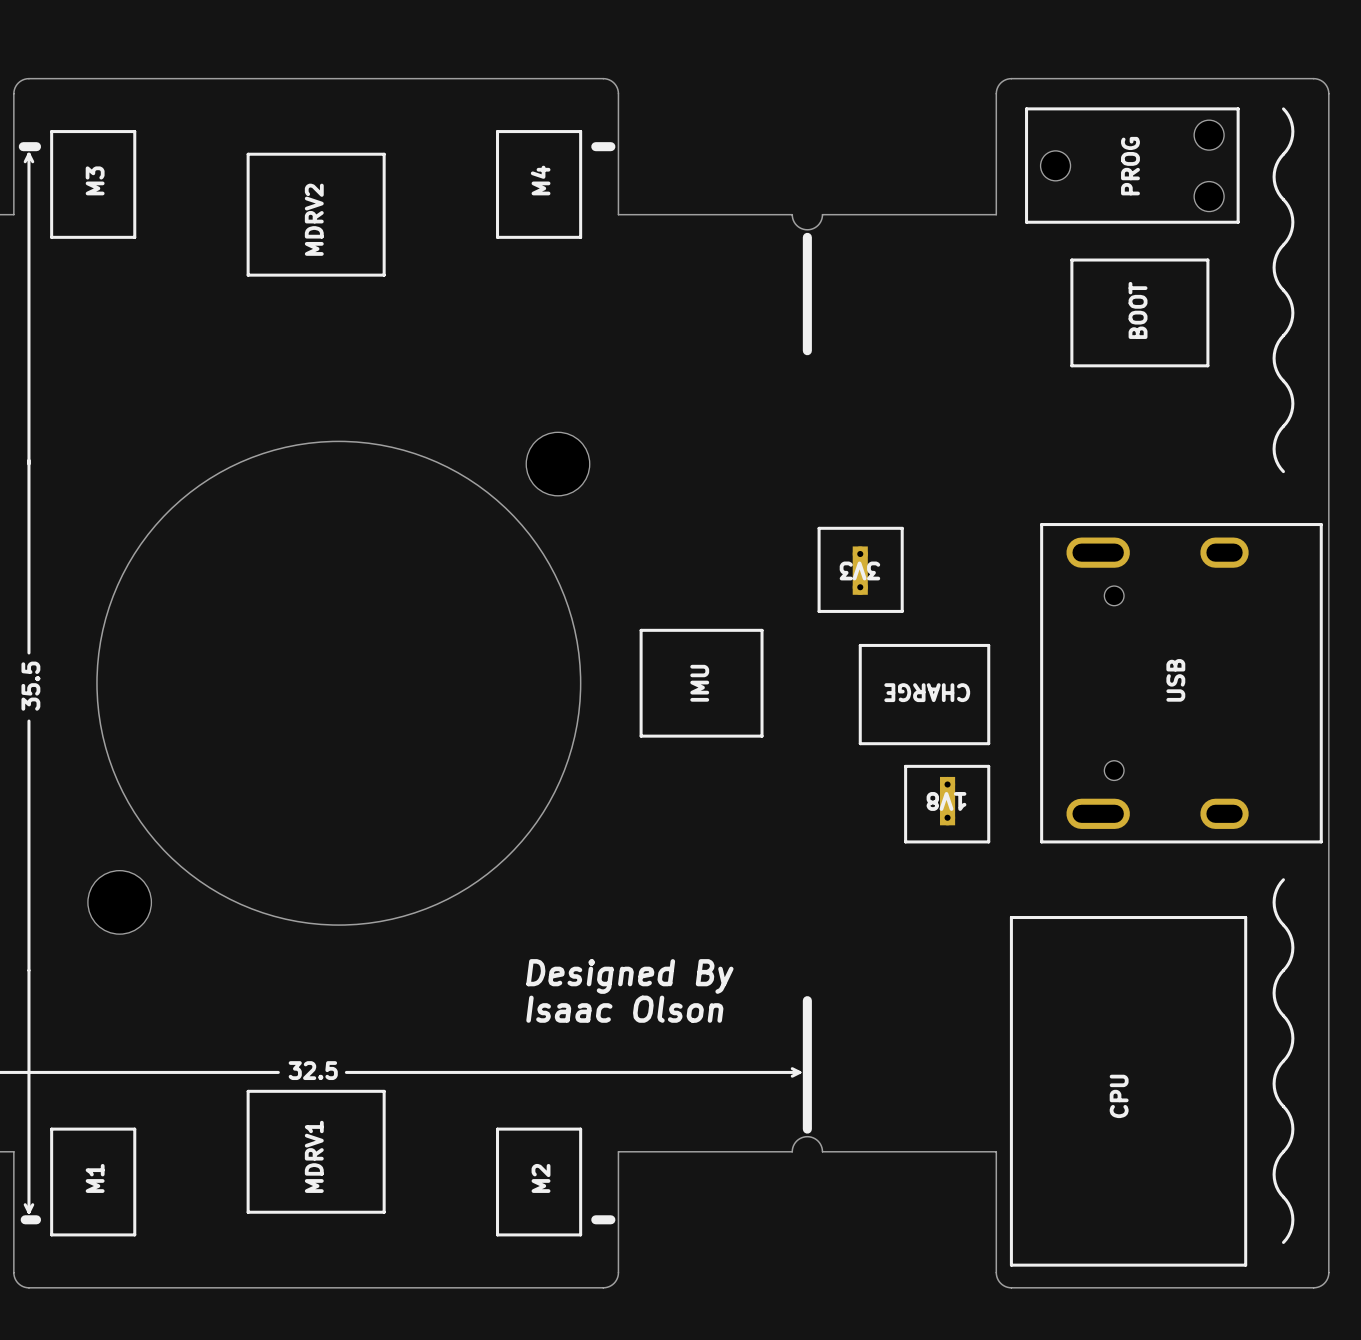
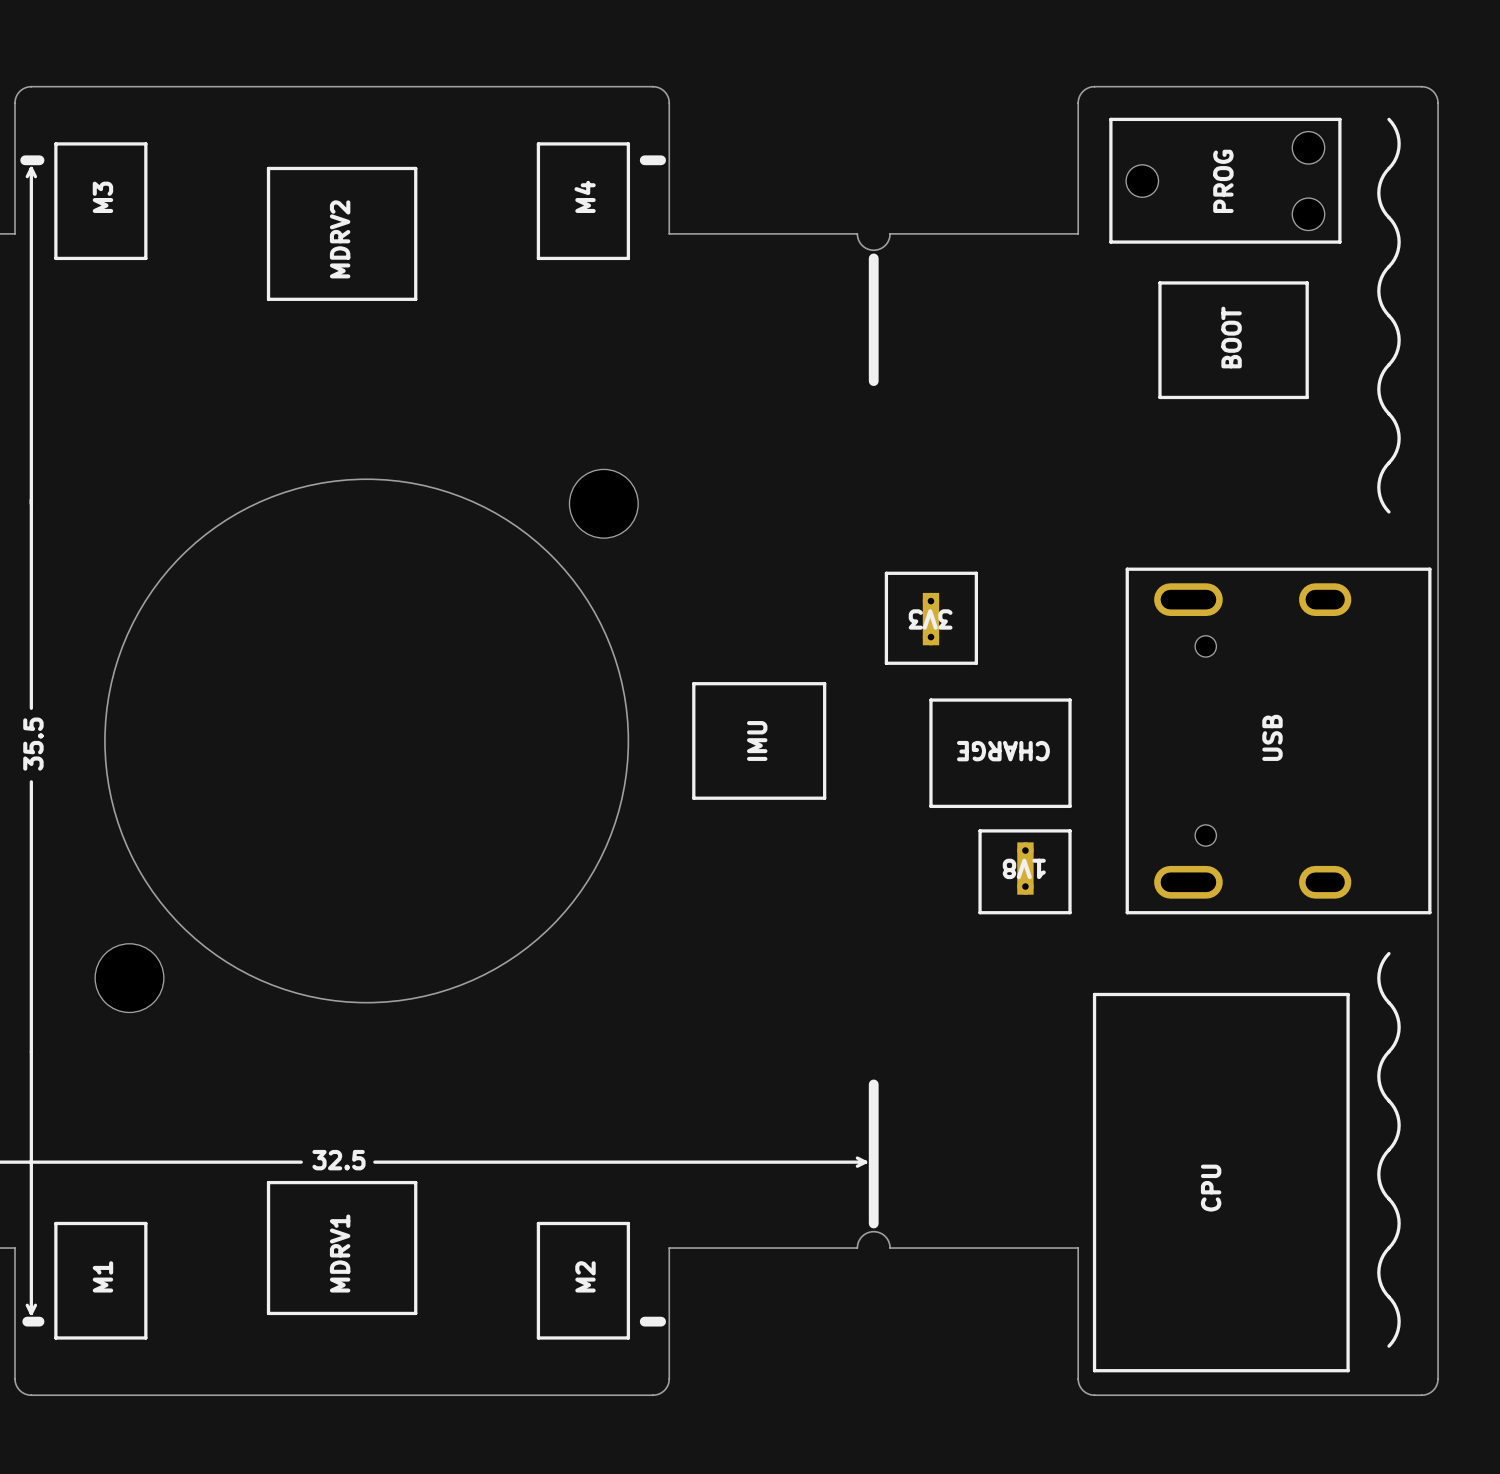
text: Designed By (629, 976) -> none
text: Isaac Olson (624, 1009) -> none

